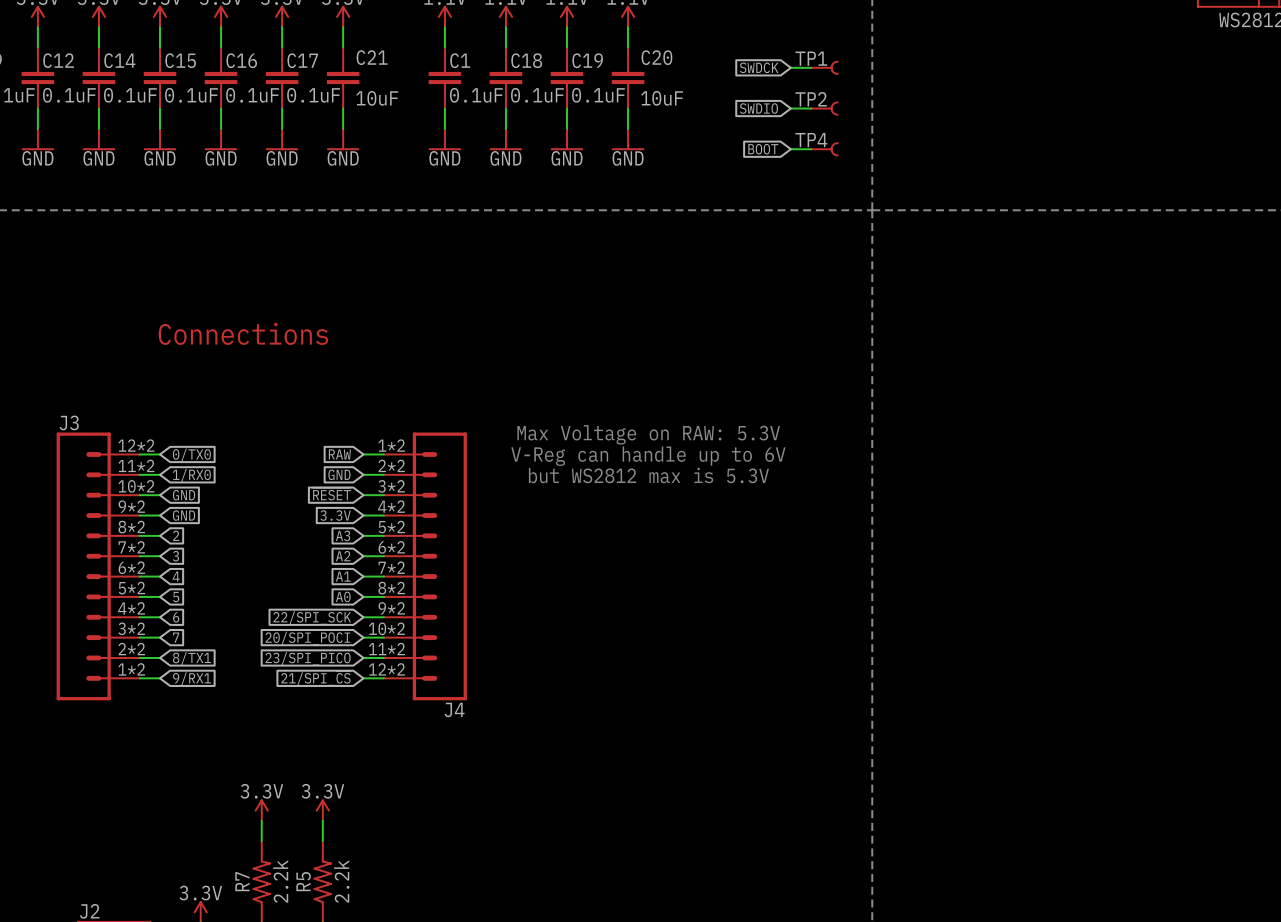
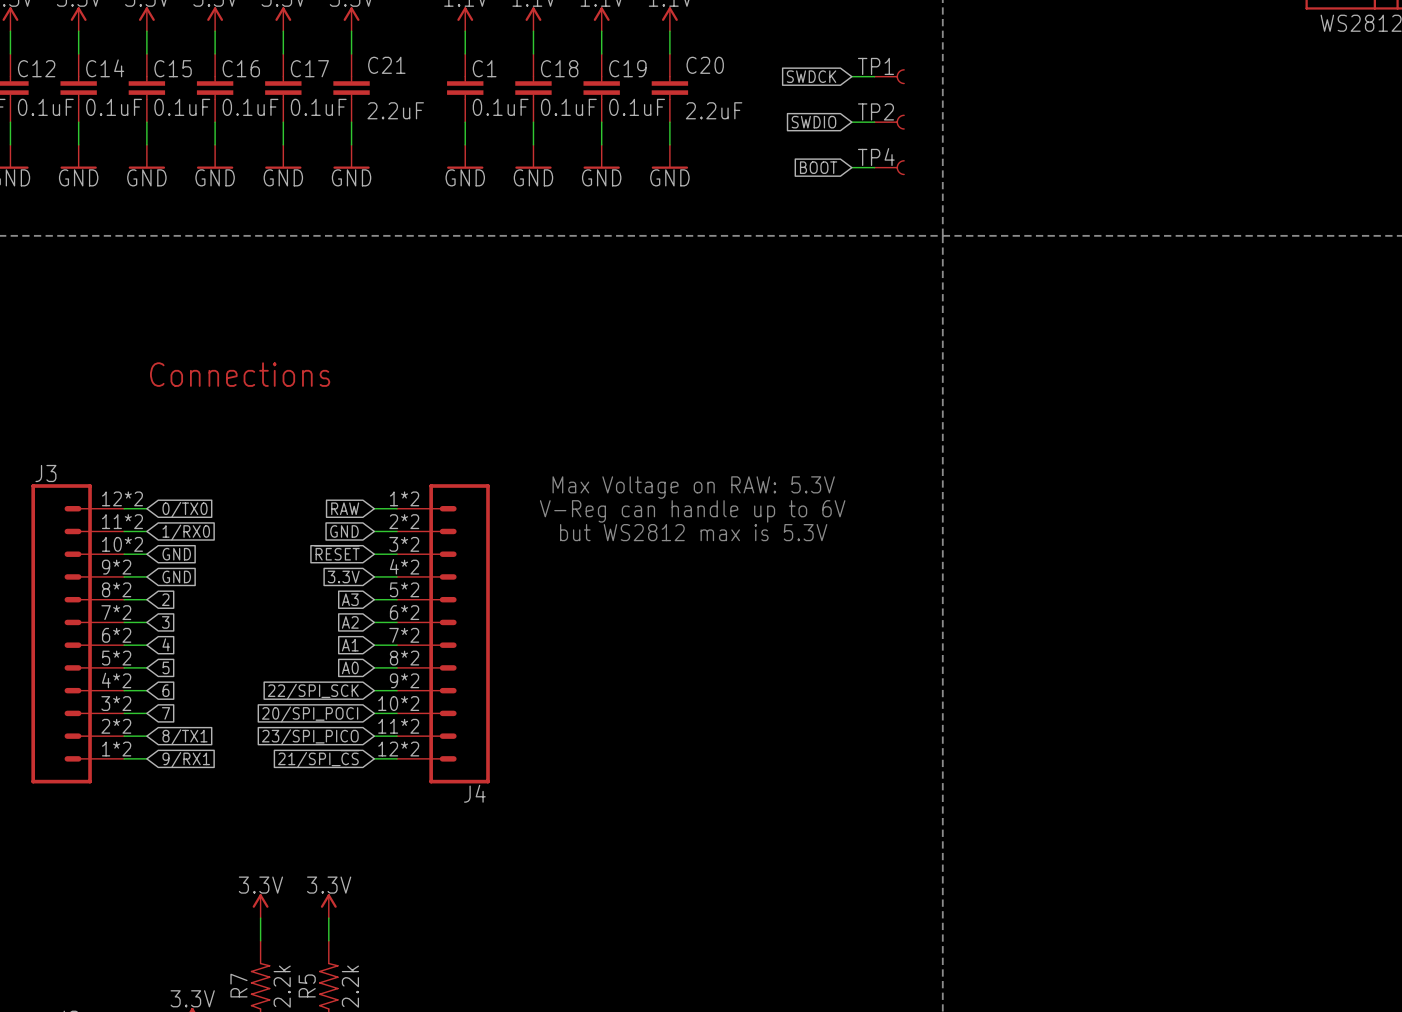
C21 value: 10uF (377, 98) -> 2.2uF (395, 110)
C20 value: 10uF (662, 98) -> 2.2uF (714, 110)

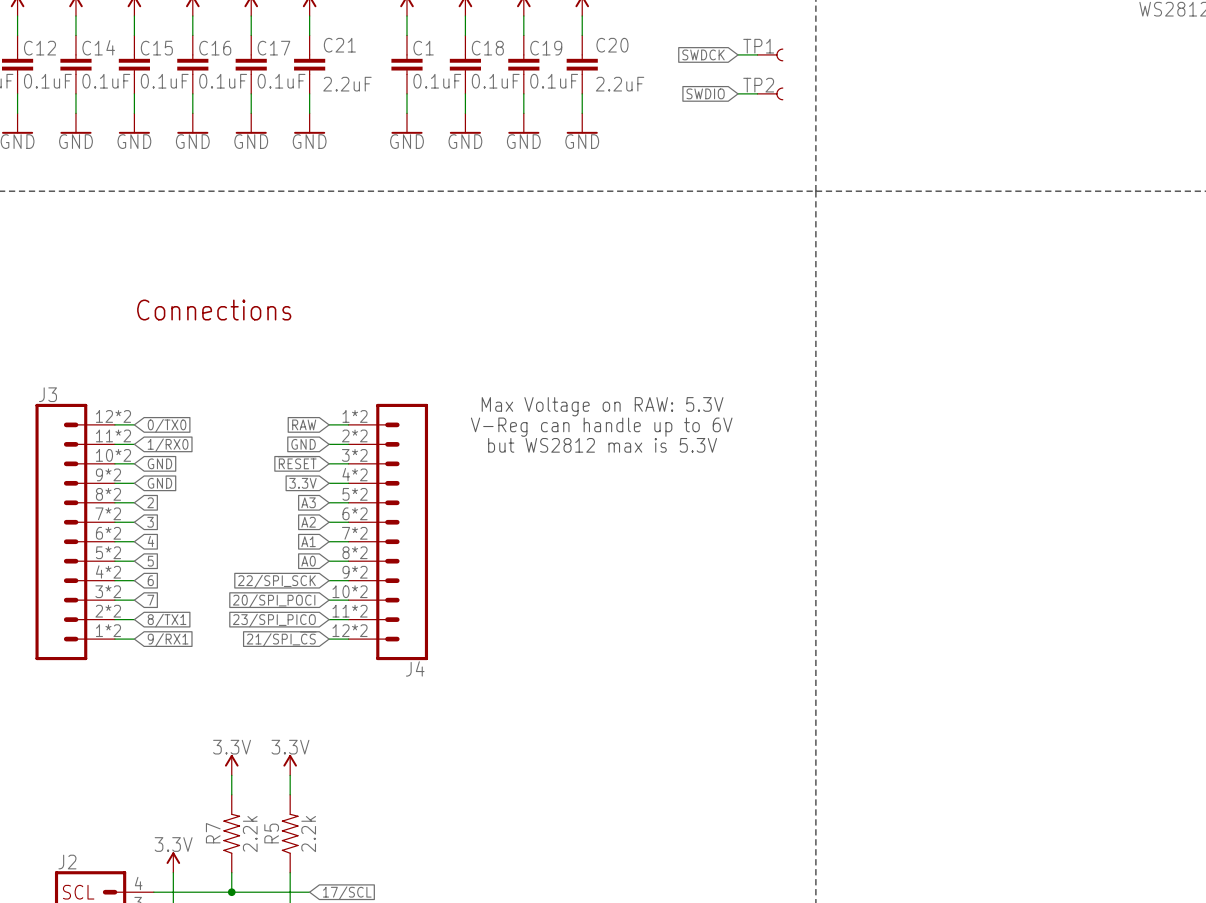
global label: BOOT (818, 167) -> none
wire: (851, 167) (874, 167) -> none
TP4: (889, 167) -> none

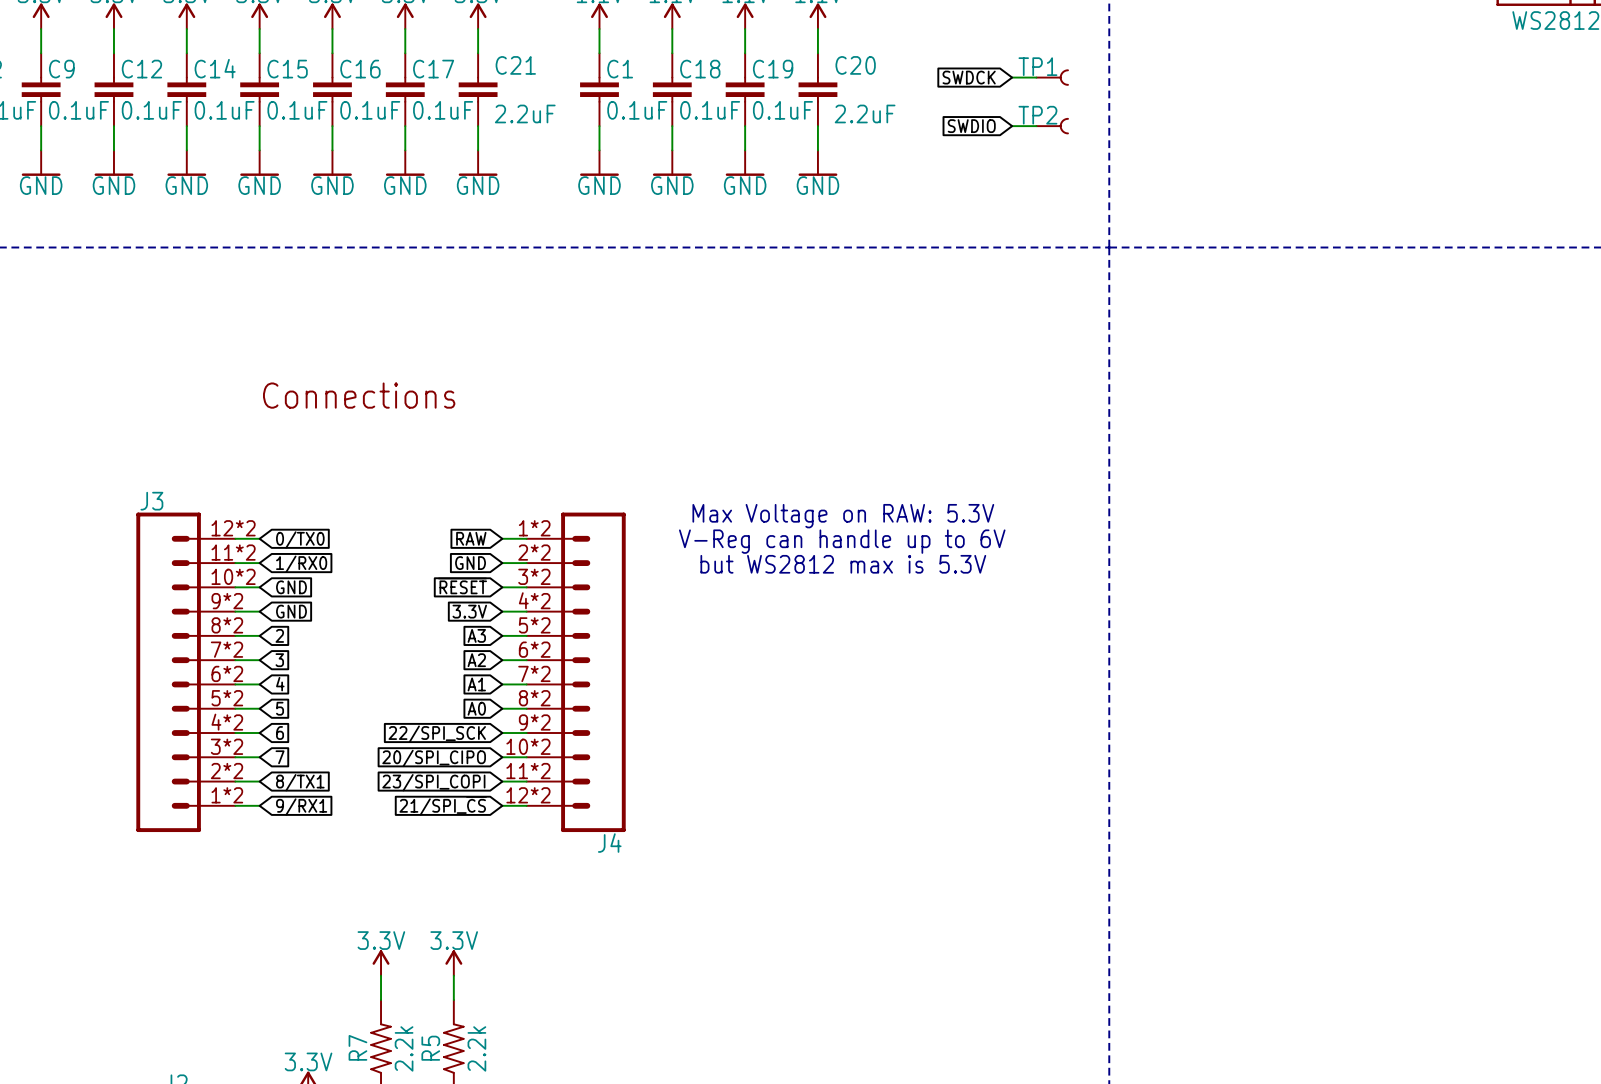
global label: 20/SPI_POCI (274, 601) -> 20/SPI_CIPO (434, 758)
global label: 23/SPI_PICO (274, 620) -> 23/SPI_COPI (433, 782)

